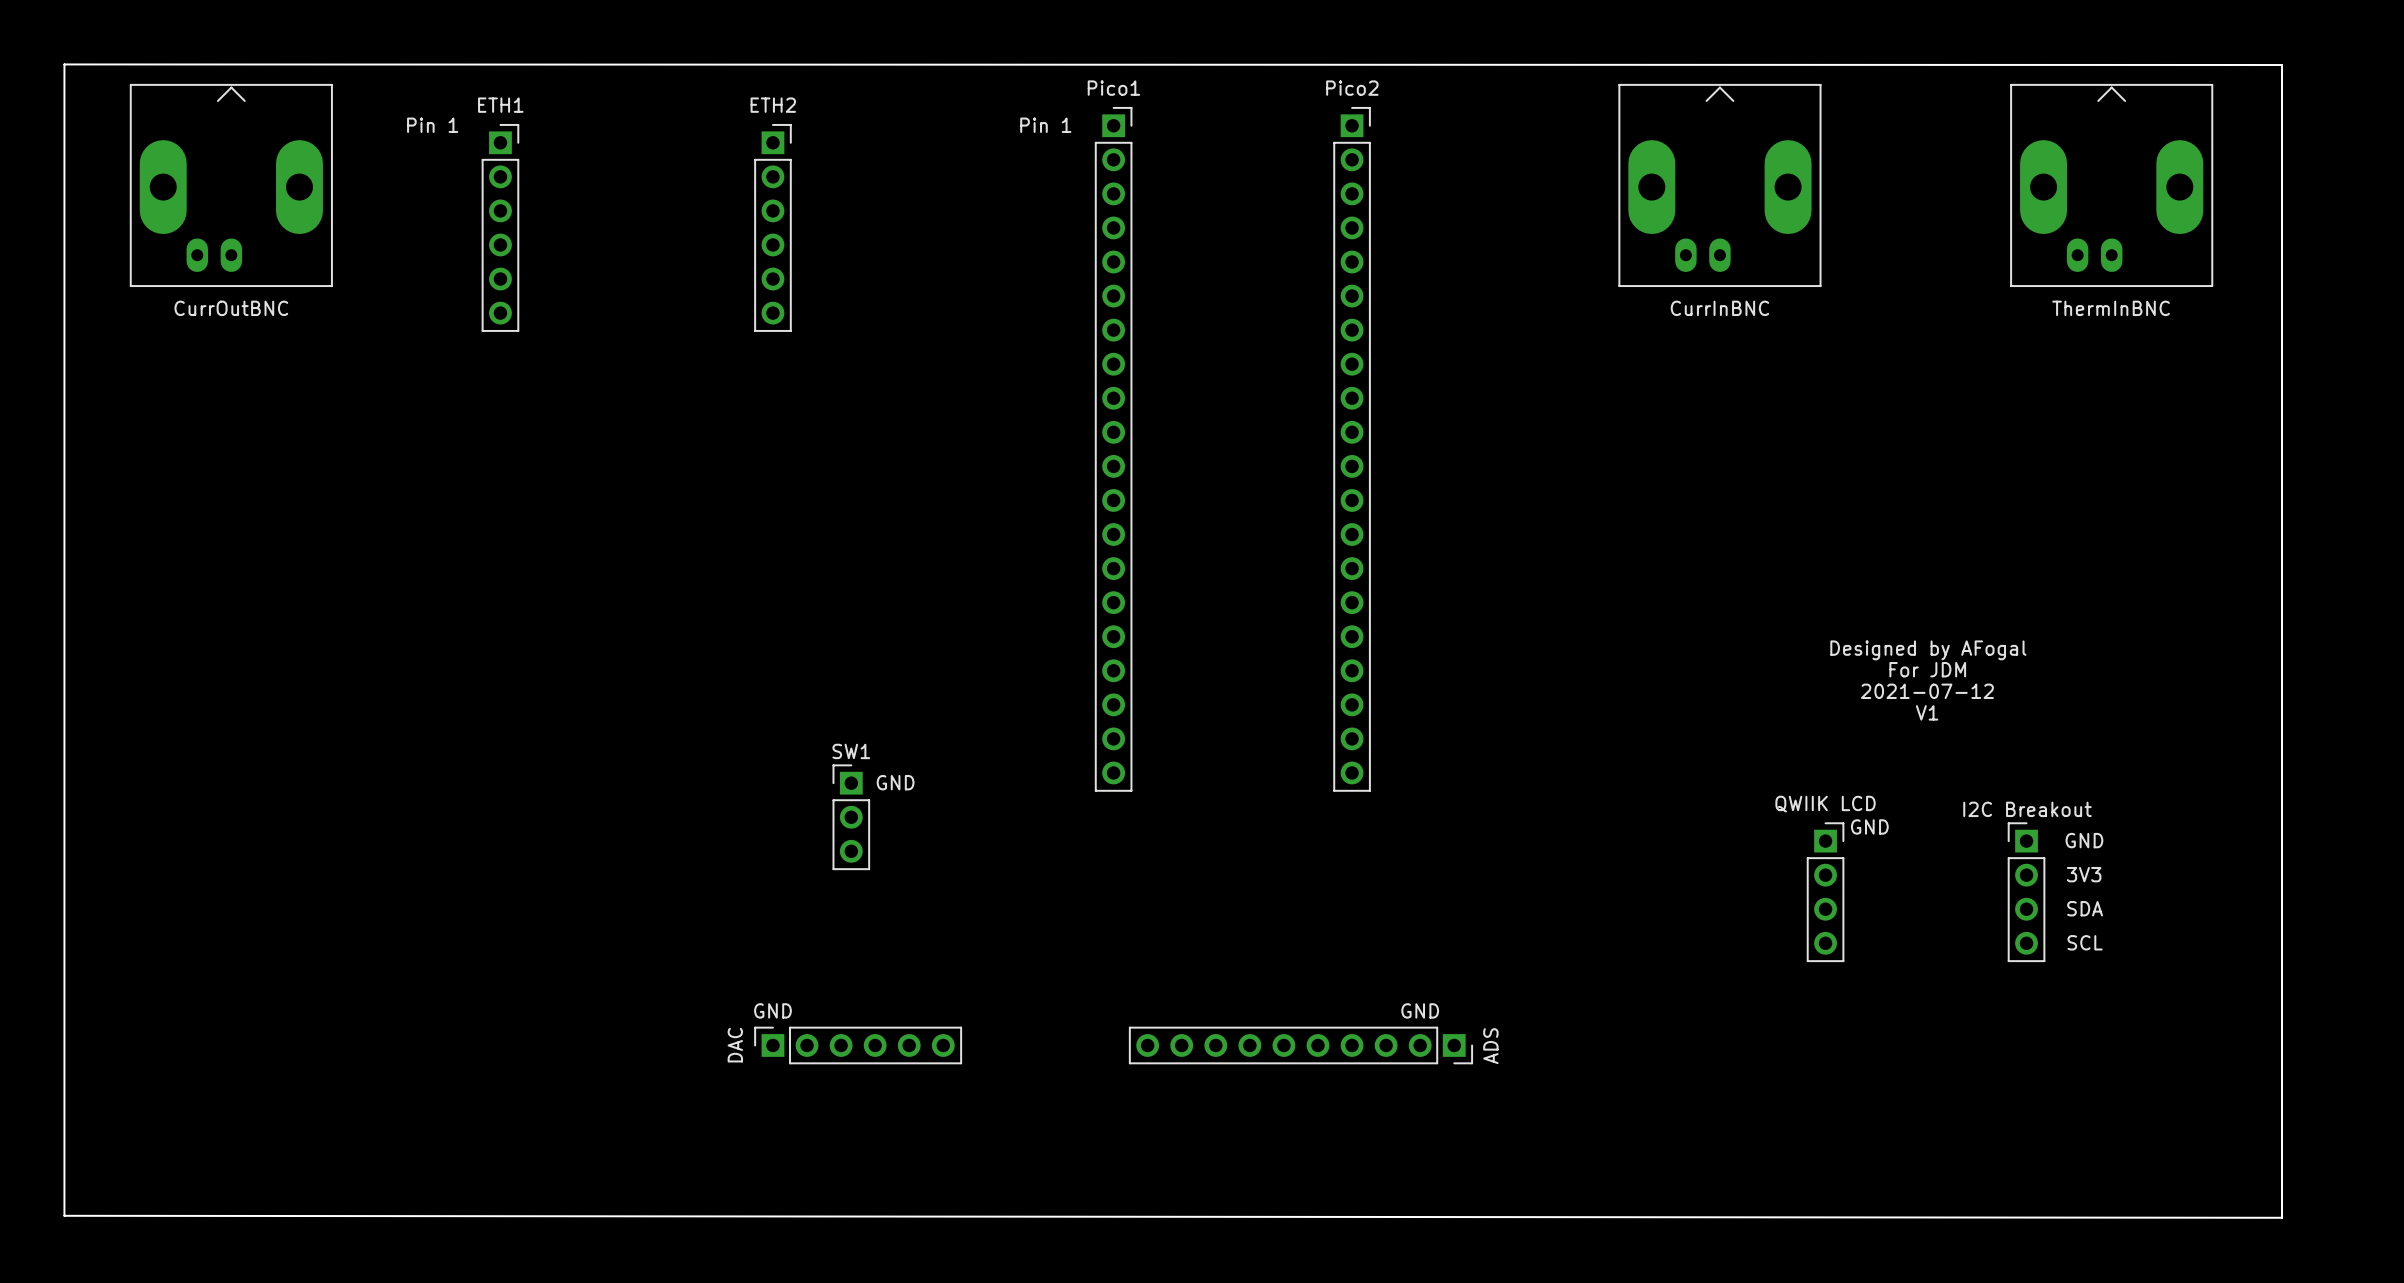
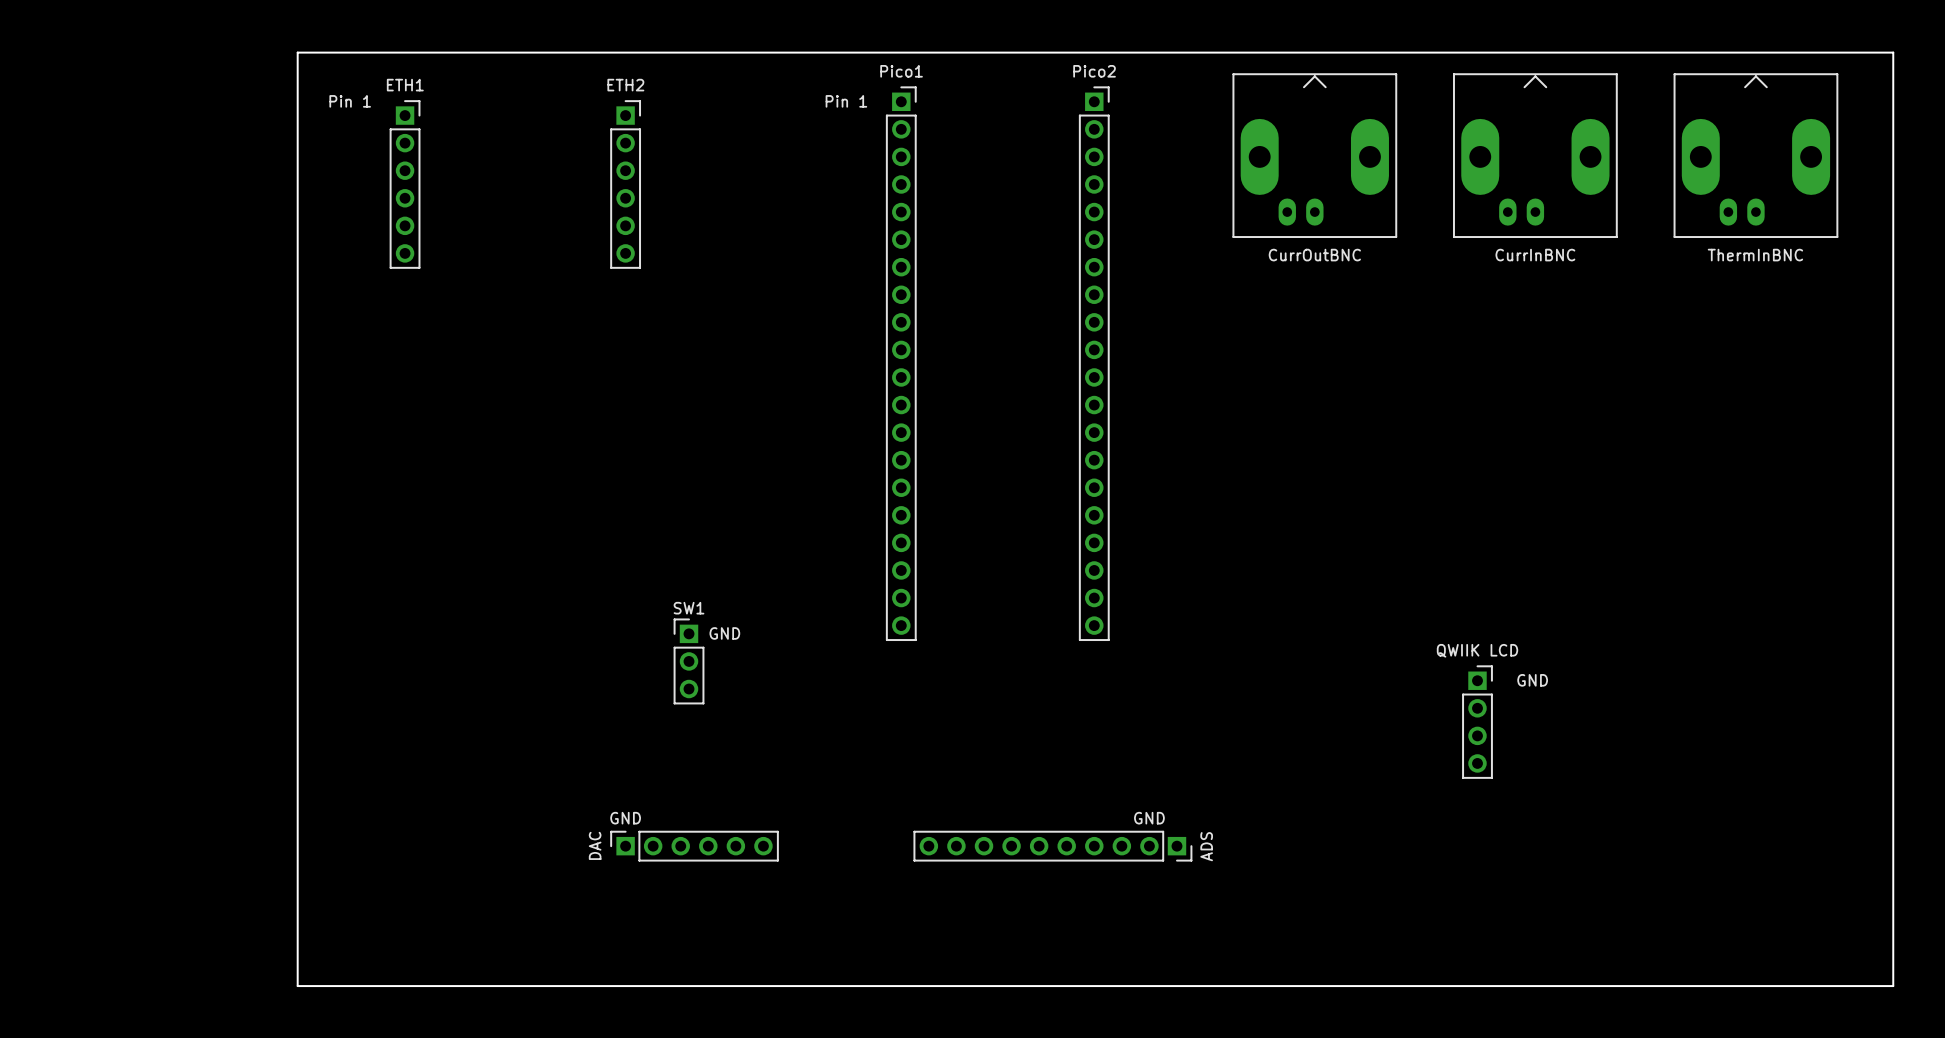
board edge: (64, 64) (2282, 65) (2282, 1217) (64, 1215) (64, 64) -> (297, 52) (297, 986) (1893, 986) (1893, 52) (297, 52)
CurrOutBNC: (231, 185) -> none
CurrInBNC position: (1719, 185) -> (1535, 155)
ThermInBNC position: (2111, 185) -> (1755, 155)
CurrOutBNC: none -> (1314, 155)
text: Designed by AFogal (1928, 650) -> none
text: For JDM (1927, 669) -> none
text: 2021-07-12 (1927, 691) -> none
text: V1 (1927, 712) -> none
text position: GND (1869, 826) -> GND (1532, 680)
text: GND (2084, 840) -> none
text: 3V3 (2084, 874) -> none
I2C Breakout: (2026, 892) -> none
text: SDA (2085, 908) -> none
text: SCL (2085, 942) -> none

